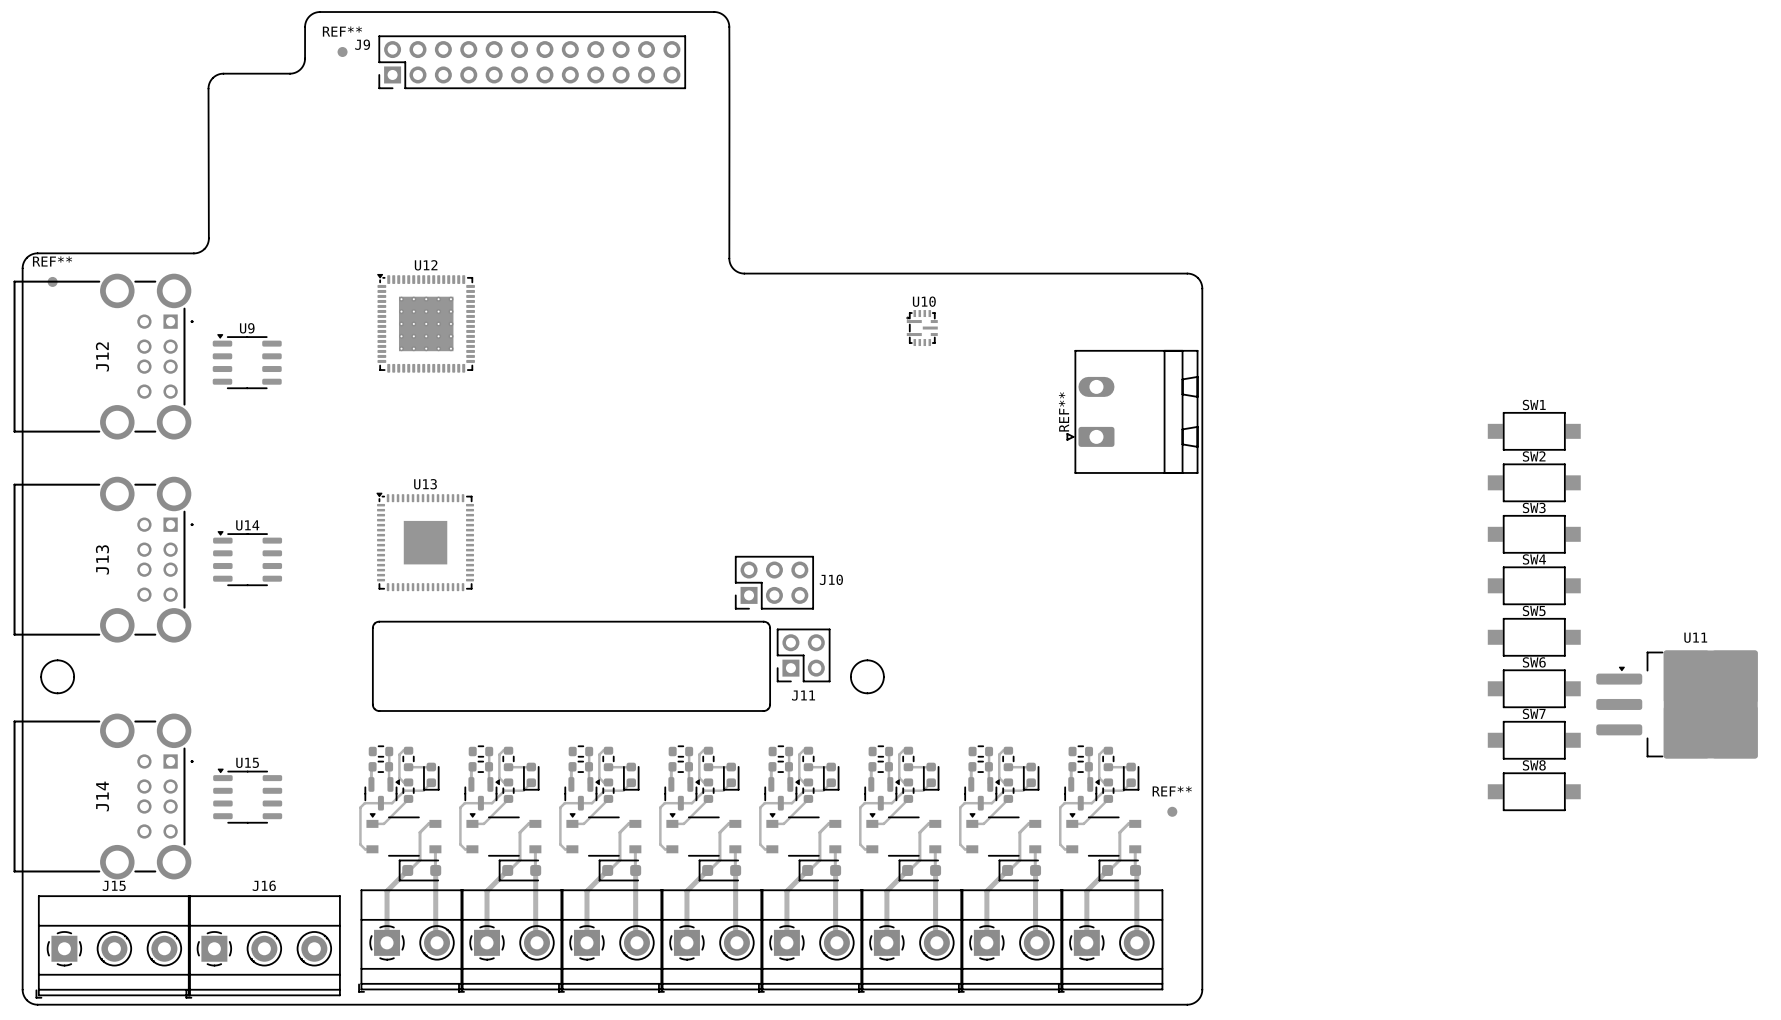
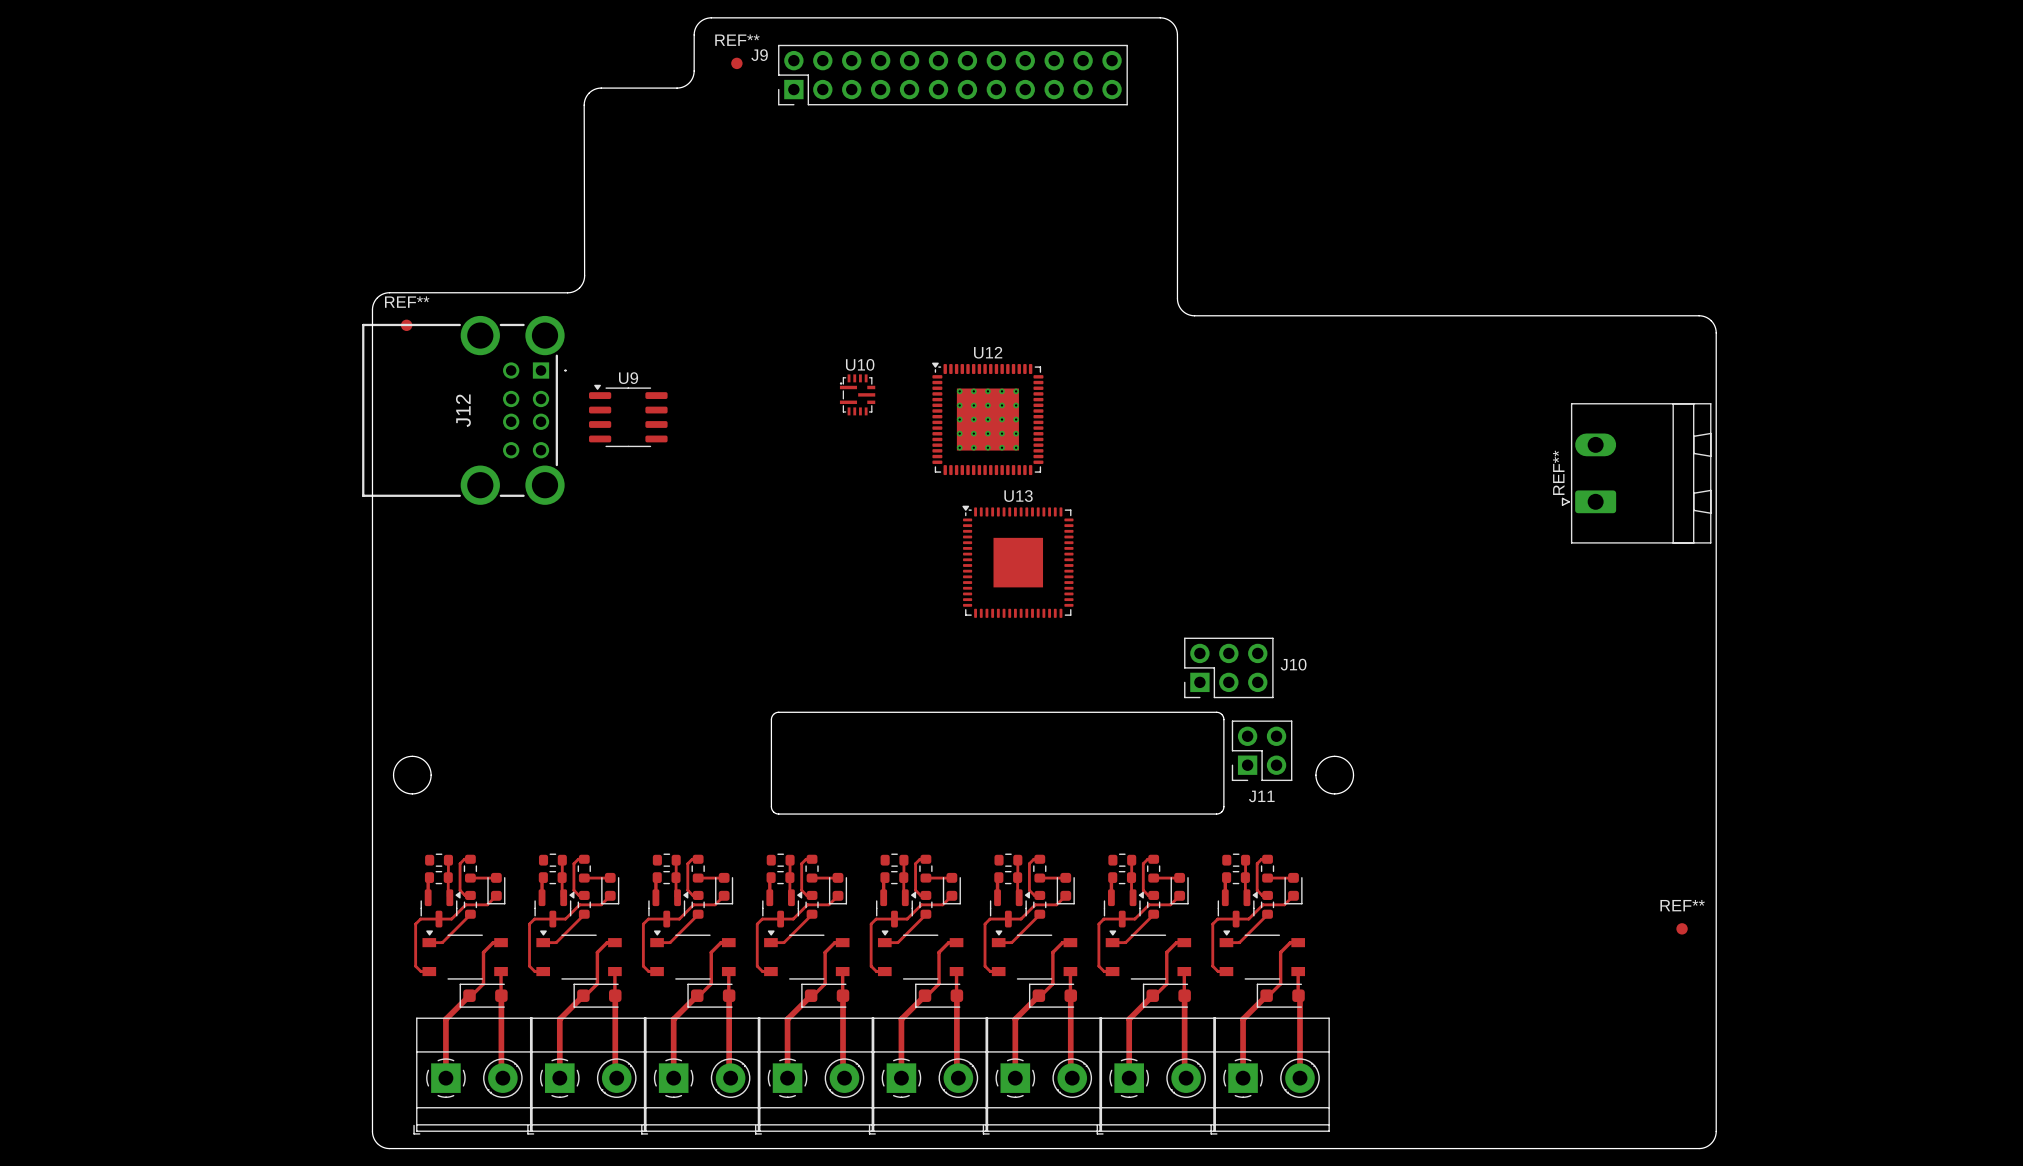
board edge: (619, 12) (314, 13) (305, 22) (304, 60) (298, 71) (290, 73) (221, 73) (214, 76) (209, 82) (208, 239) (203, 250) (193, 253) (36, 253) (28, 256) (23, 263) (23, 995) (28, 1001) (36, 1004) (337, 1004) -> (711, 17) (701, 20) (694, 29) (694, 72) (692, 79) (686, 85) (677, 88) (598, 88) (591, 91) (585, 97) (584, 105) (584, 276) (578, 288) (567, 292) (387, 292) (378, 296) (373, 304) (372, 1131) (377, 1143) (389, 1148)
board edge: (714, 12) (723, 15) (729, 25) (729, 258) (734, 270) (744, 273) (1044, 273) -> (818, 17) (1160, 17) (1171, 21) (1176, 28) (1177, 34) (1177, 300) (1183, 311) (1194, 315)
REF**: (342, 51) -> none
REF**: none -> (736, 63)
J9 position: (532, 62) -> (952, 75)
board edge: (1187, 273) (1197, 277) (1202, 288) (1202, 989) (1197, 1000) (1187, 1004) -> (1357, 315) (1699, 315) (1711, 321) (1716, 332) (1714, 1138) (1708, 1145) (1699, 1148) (1357, 1148)
REF**: (52, 281) -> none
REF**: none -> (406, 325)
U12 position: (426, 323) -> (987, 418)
U10 position: (922, 328) -> (857, 394)
J12 position: (103, 356) -> (464, 410)
U9 position: (247, 361) -> (628, 415)
REF**: (1132, 411) -> none
REF**: none -> (1636, 473)
SW1: (1534, 431) -> none
SW2: (1534, 482) -> none
SW3: (1534, 534) -> none
U13 position: (425, 541) -> (1017, 561)
U14: (247, 558) -> none
J13: (103, 559) -> none
J10 position: (774, 582) -> (1228, 667)
SW4: (1534, 585) -> none
board edge: (679, 621) (379, 621) (374, 623) (372, 628) (372, 704) (377, 710) (679, 710) -> (778, 712) (773, 714) (771, 719) (771, 807) (773, 812) (778, 814)
board edge: (763, 621) (768, 623) (770, 628) (770, 705) (767, 709) (763, 710) -> (874, 712) (1216, 712) (1221, 714) (1223, 719) (1223, 807) (1218, 813) (874, 814)
SW5: (1534, 637) -> none
J11 position: (803, 655) -> (1262, 750)
board edge: (57, 660) (69, 665) (74, 676) (69, 688) (57, 693) (45, 688) (41, 676) (45, 665) (57, 660) -> none
board edge: none -> (412, 756) (425, 761) (431, 775) (425, 788) (412, 793) (399, 788) (393, 775) (399, 761) (412, 756)
board edge: (867, 660) (855, 665) (850, 676) (855, 688) (867, 693) (879, 688) (883, 676) (879, 665) (867, 660) -> none
board edge: none -> (1334, 756) (1321, 761) (1315, 775) (1321, 788) (1334, 793) (1348, 788) (1353, 775) (1348, 761) (1334, 756)
SW6: (1534, 688) -> none
U11: (1676, 704) -> none
SW7: (1534, 740) -> none
SW8: (1534, 791) -> none
U15: (247, 795) -> none
J14: (103, 796) -> none
REF**: (1172, 811) -> none
REF**: none -> (1682, 928)
J15: (113, 946) -> none
J16: (263, 946) -> none

